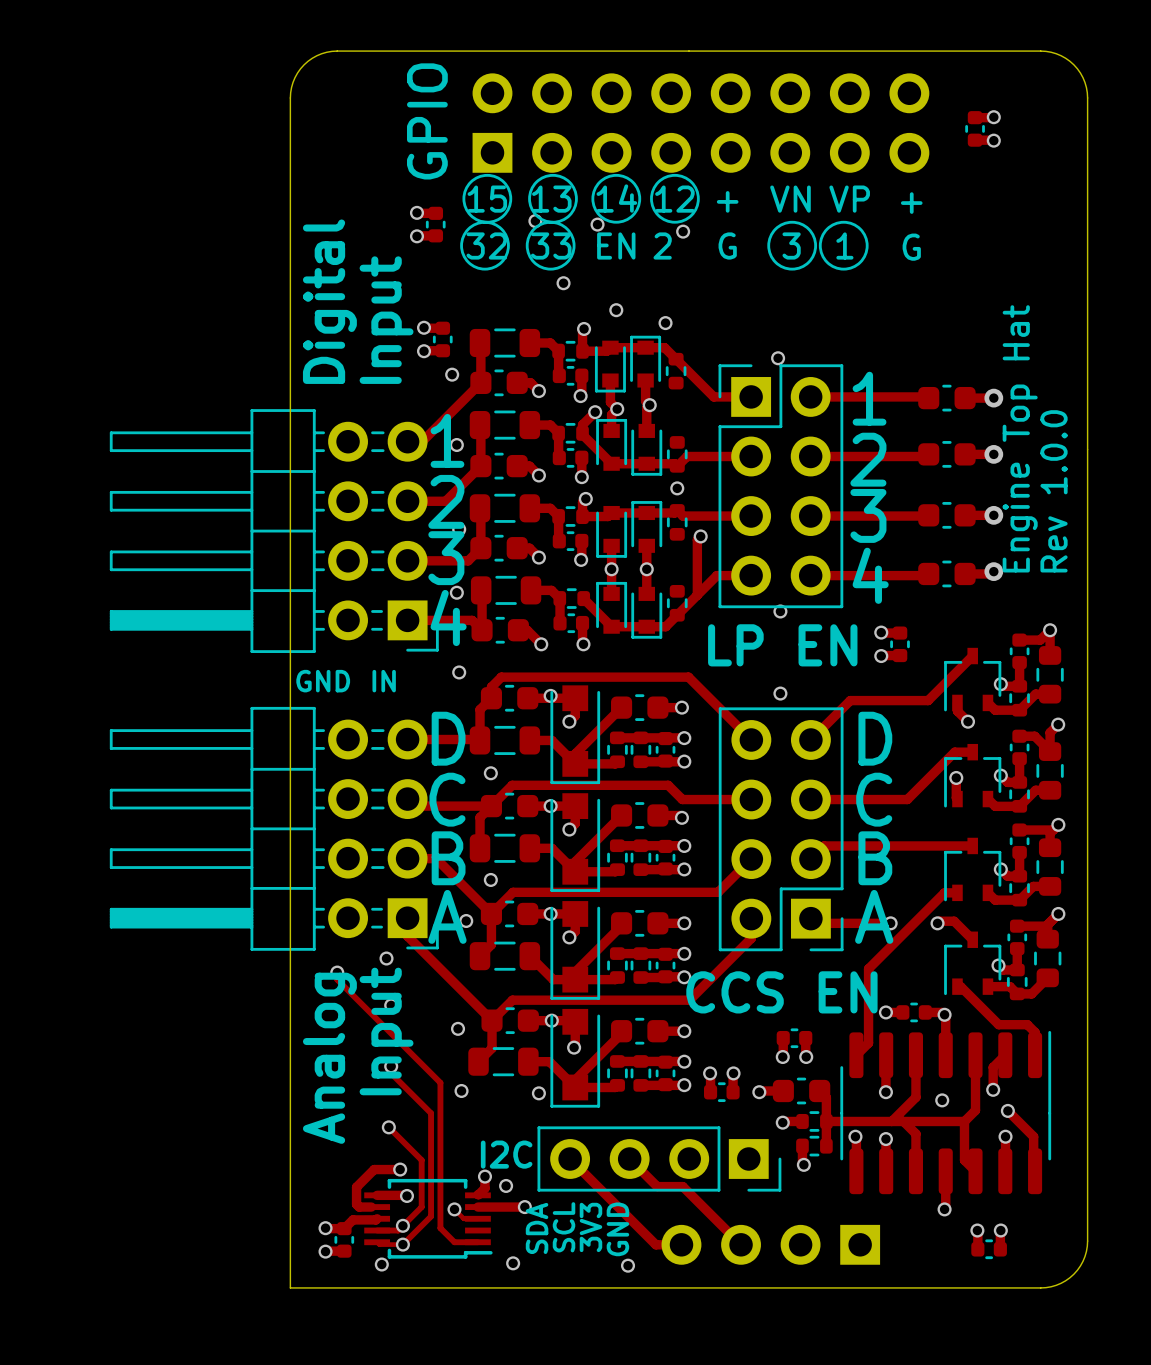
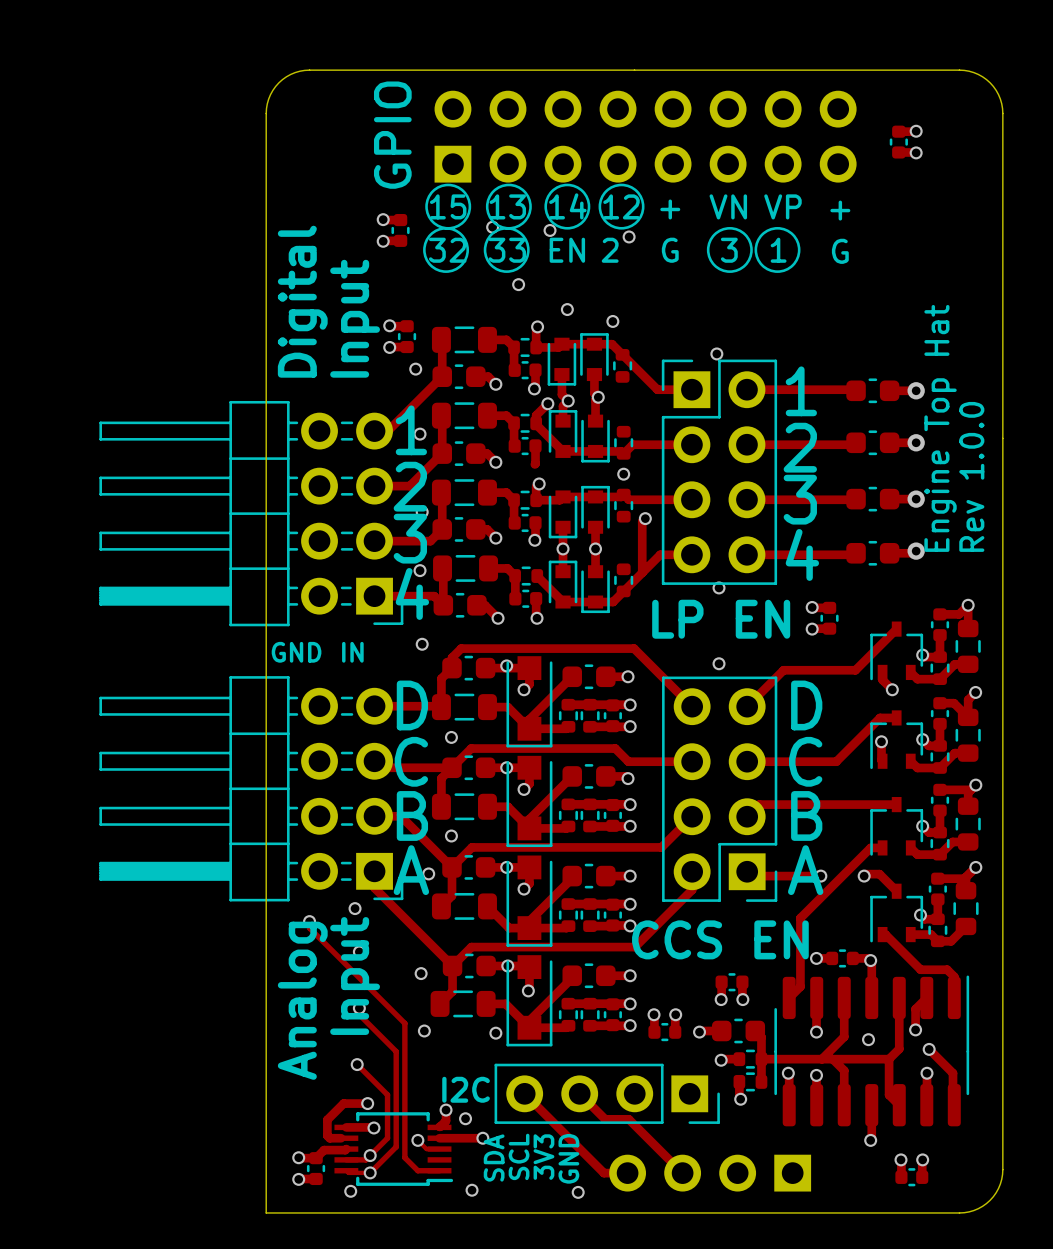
via: (581, 477) -> none

